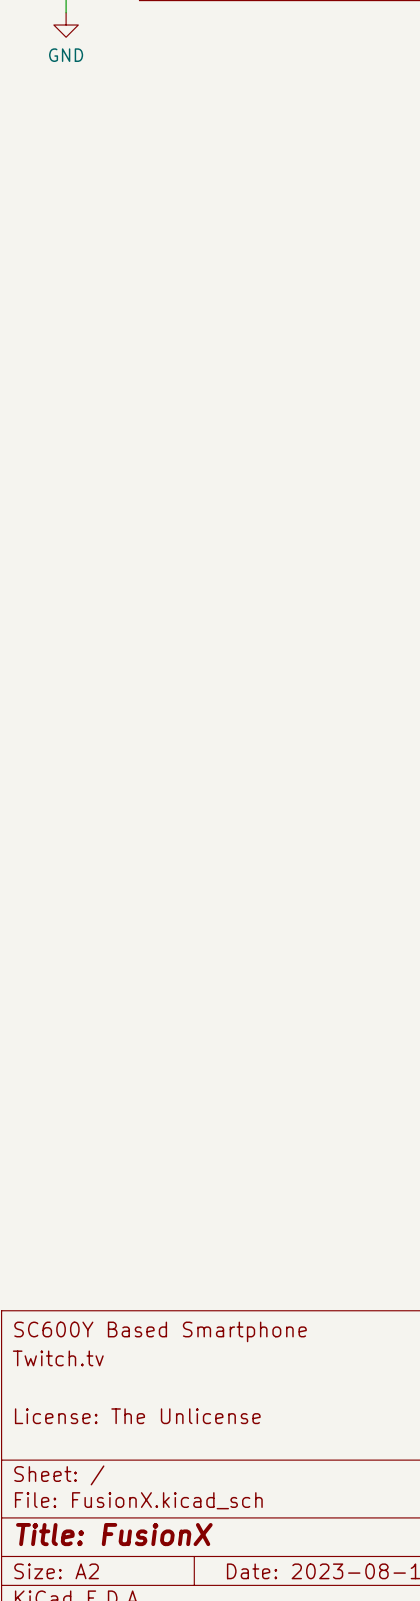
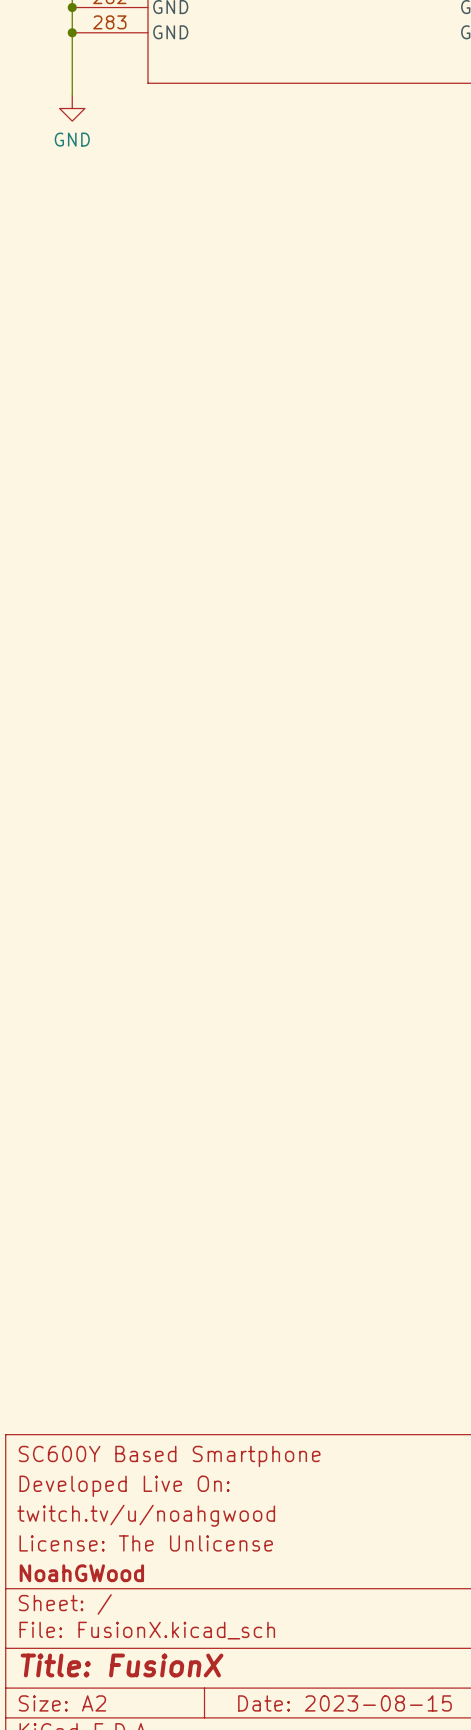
title block: Twitch.tv (58, 1358) -> Developed Live On: (124, 1486)
title block: none -> twitch.tv/u/noahgwood (146, 1515)
title block: none -> NoahGWood (81, 1573)

